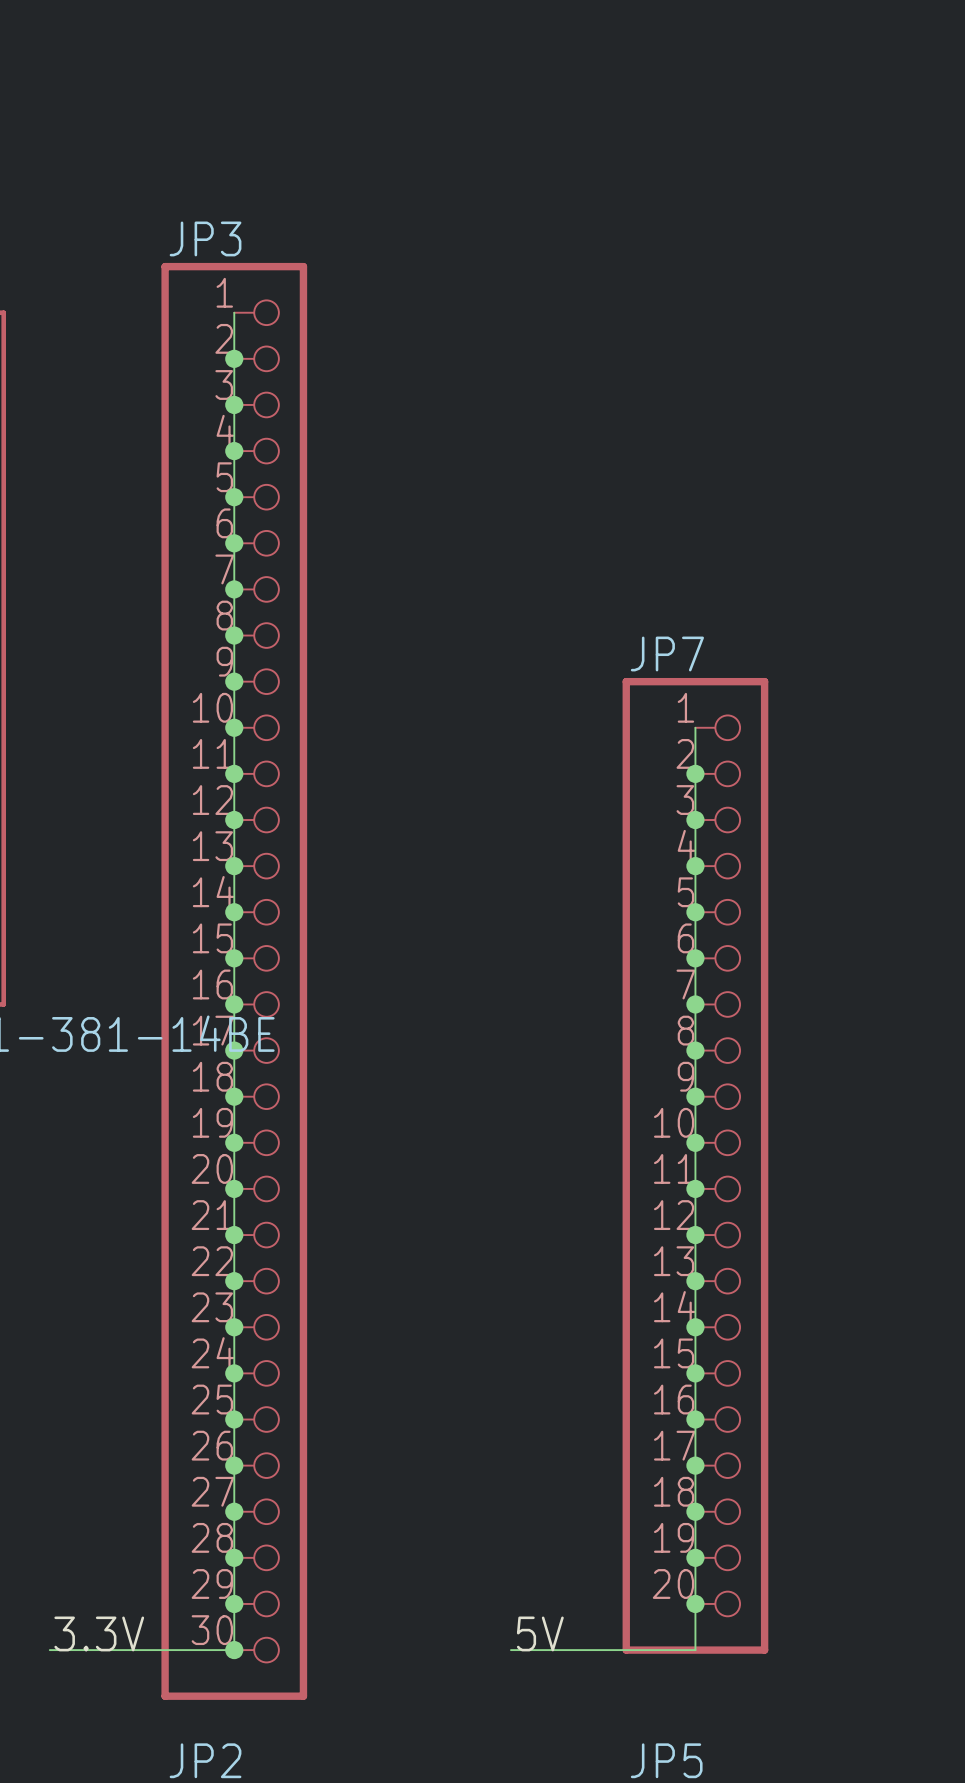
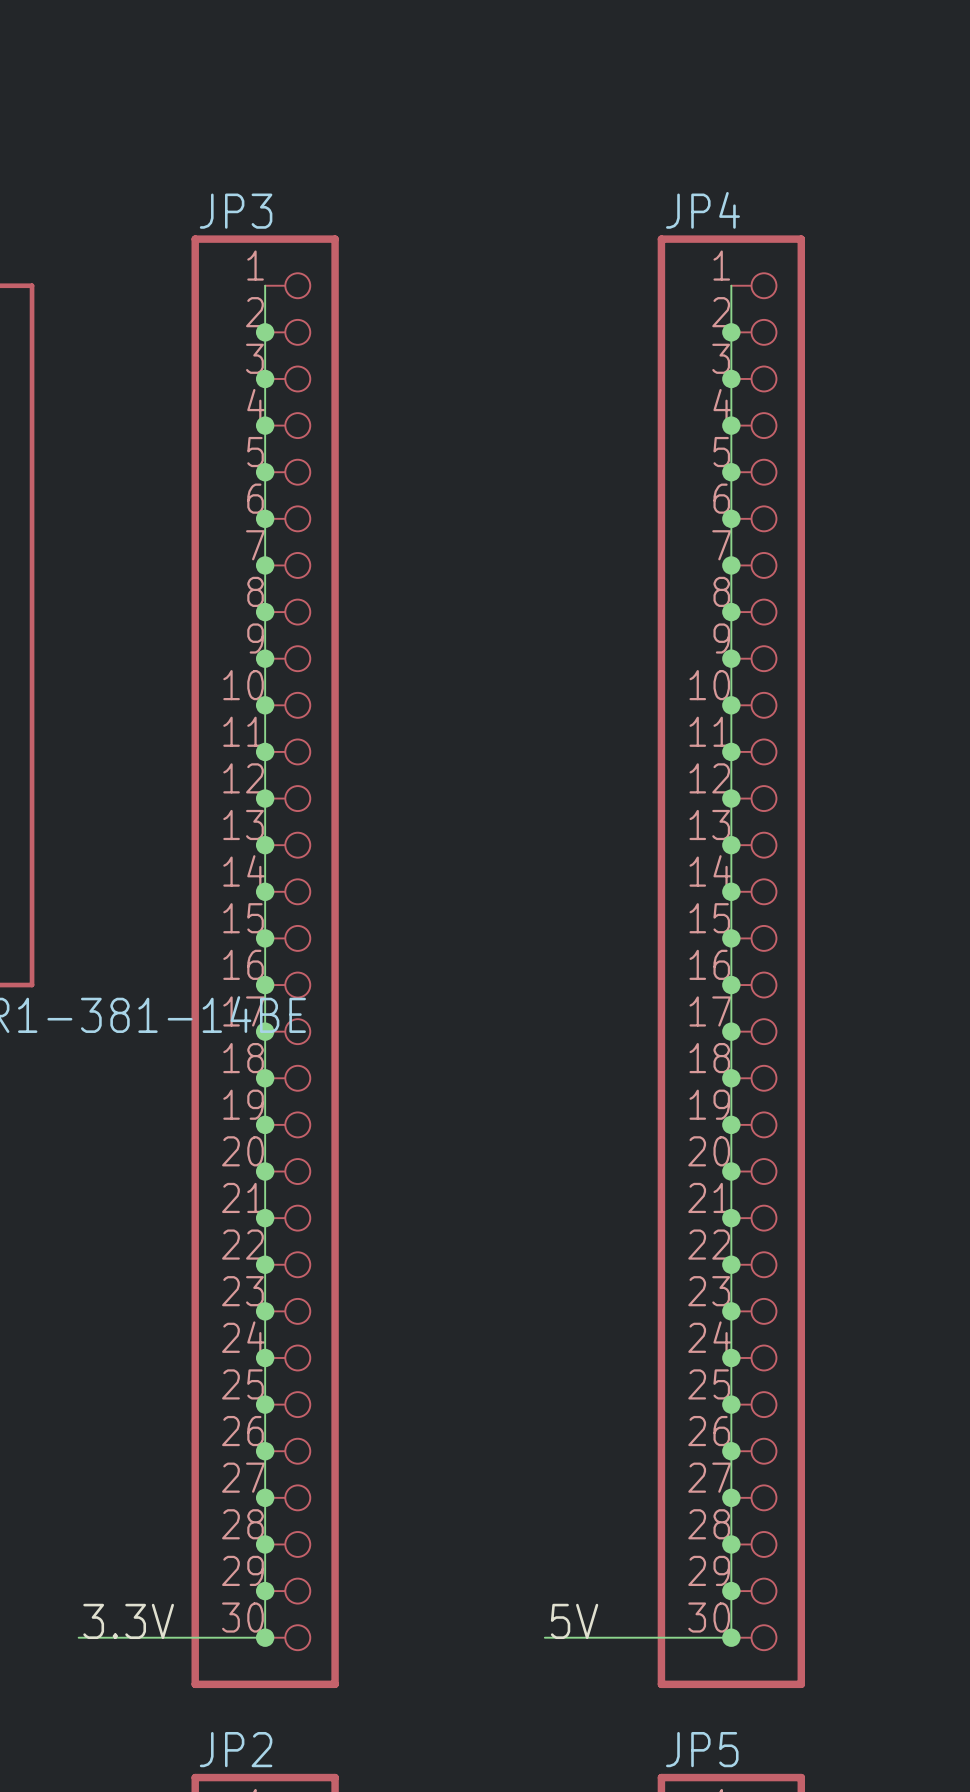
wire: none -> (731, 285) (731, 705)
junction: none -> (731, 332)
junction: none -> (731, 378)
junction: none -> (731, 425)
junction: none -> (731, 472)
junction: none -> (731, 518)
junction: none -> (731, 565)
junction: none -> (731, 612)
junction: none -> (731, 658)
junction: none -> (731, 705)
JP4: none -> (731, 961)
JP7: (695, 1165) -> none
junction: none -> (731, 1637)

